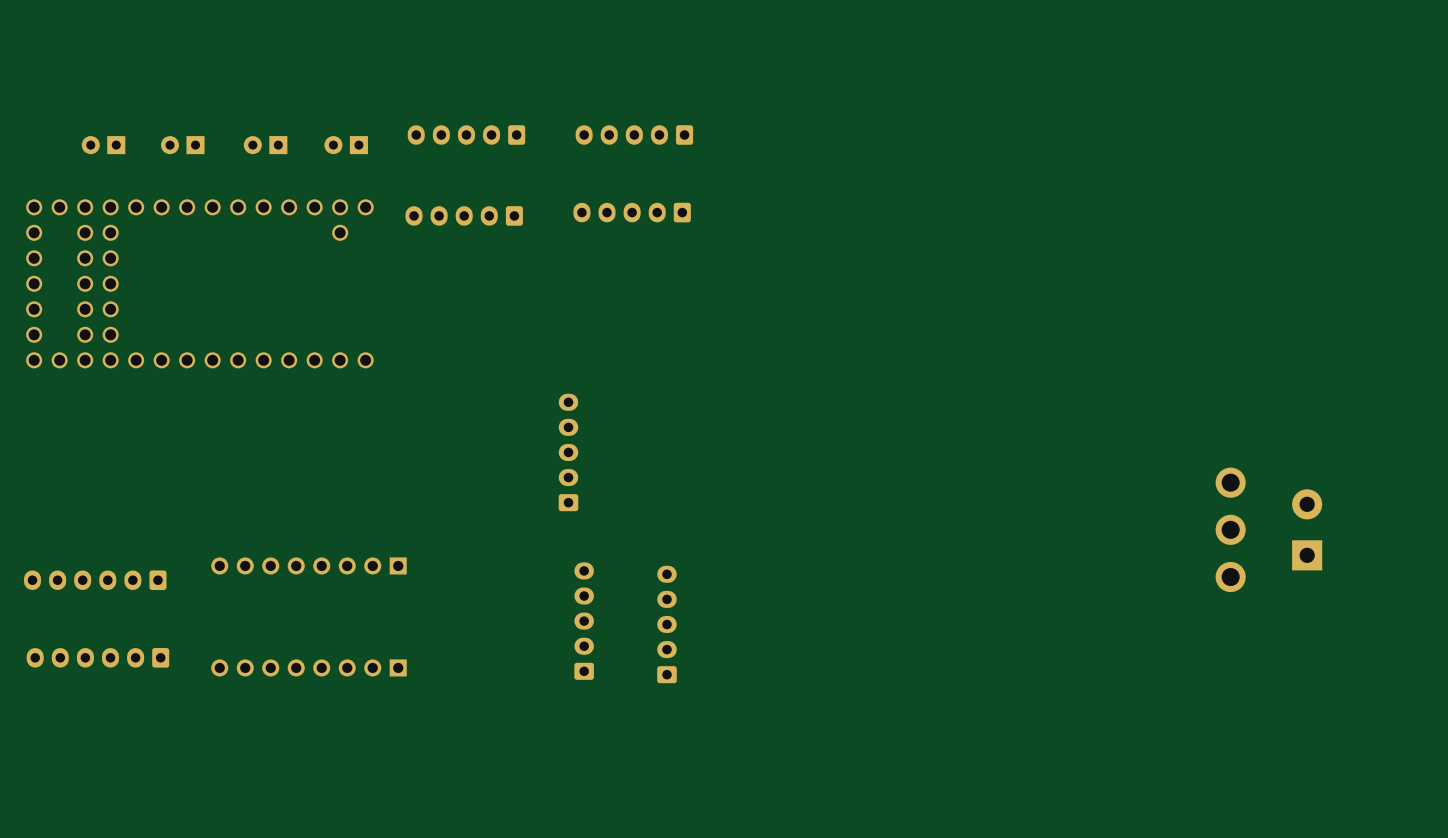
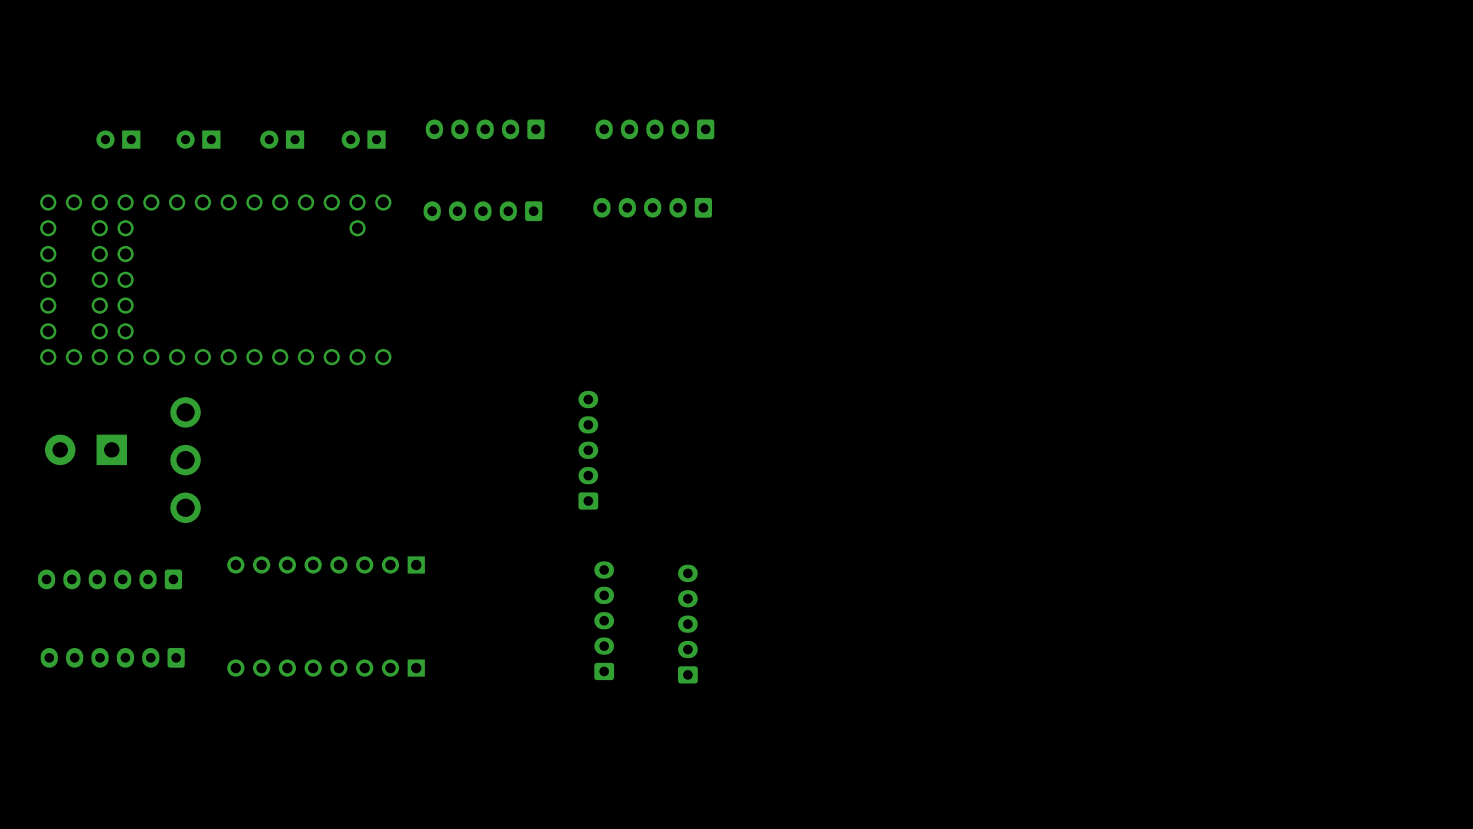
part: none -> (85, 449)
part: none -> (185, 460)
part: (1230, 529) -> none
part: (1307, 529) -> none

